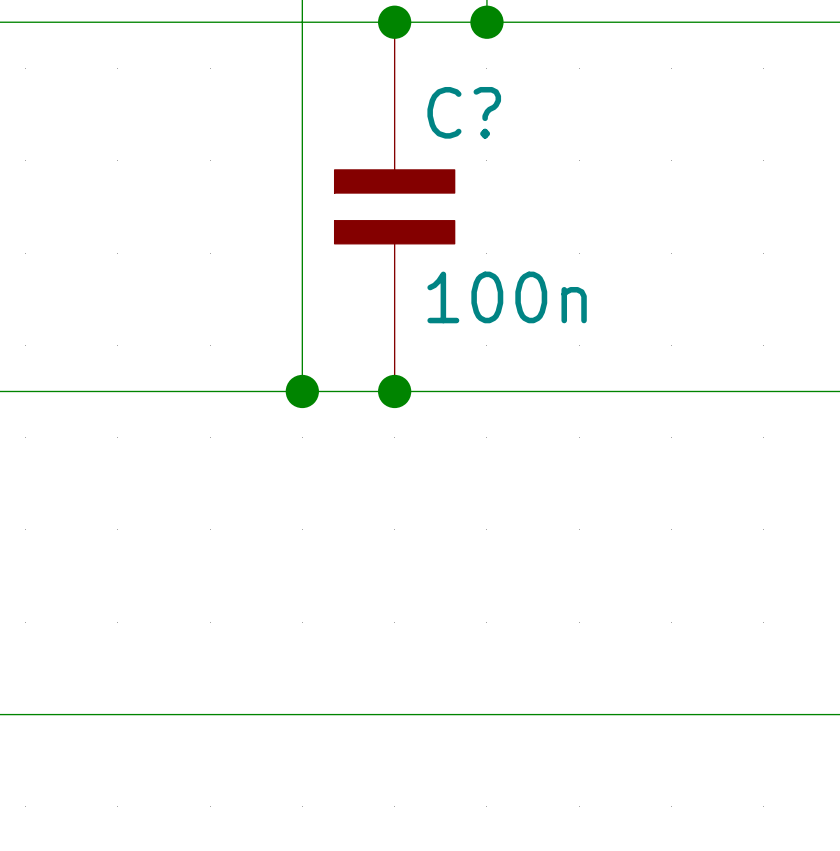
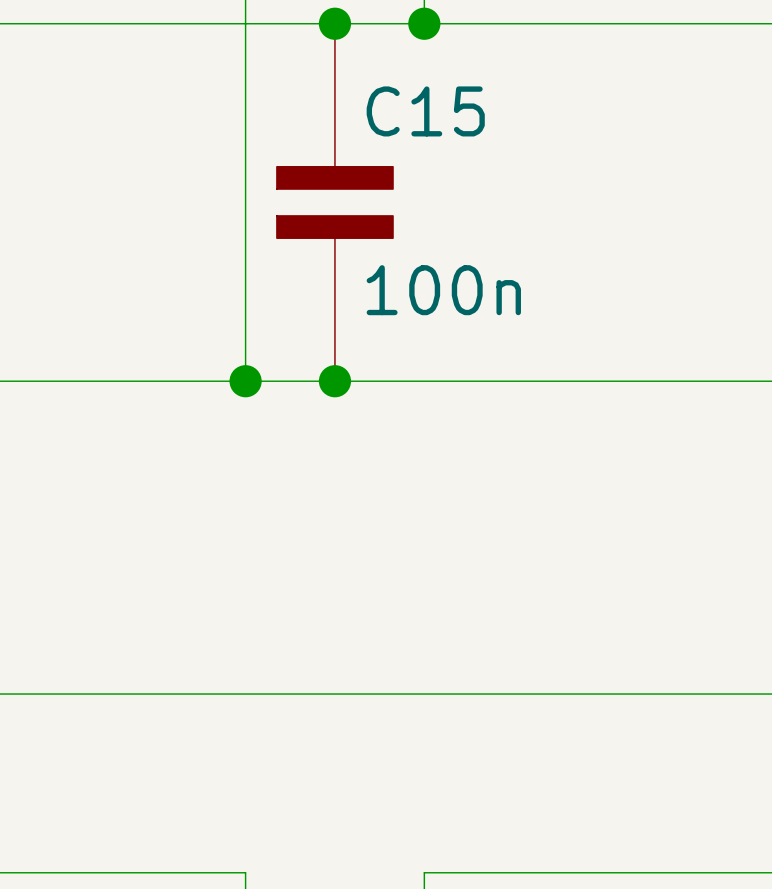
C? name: C? (464, 112) -> C15 (425, 111)

